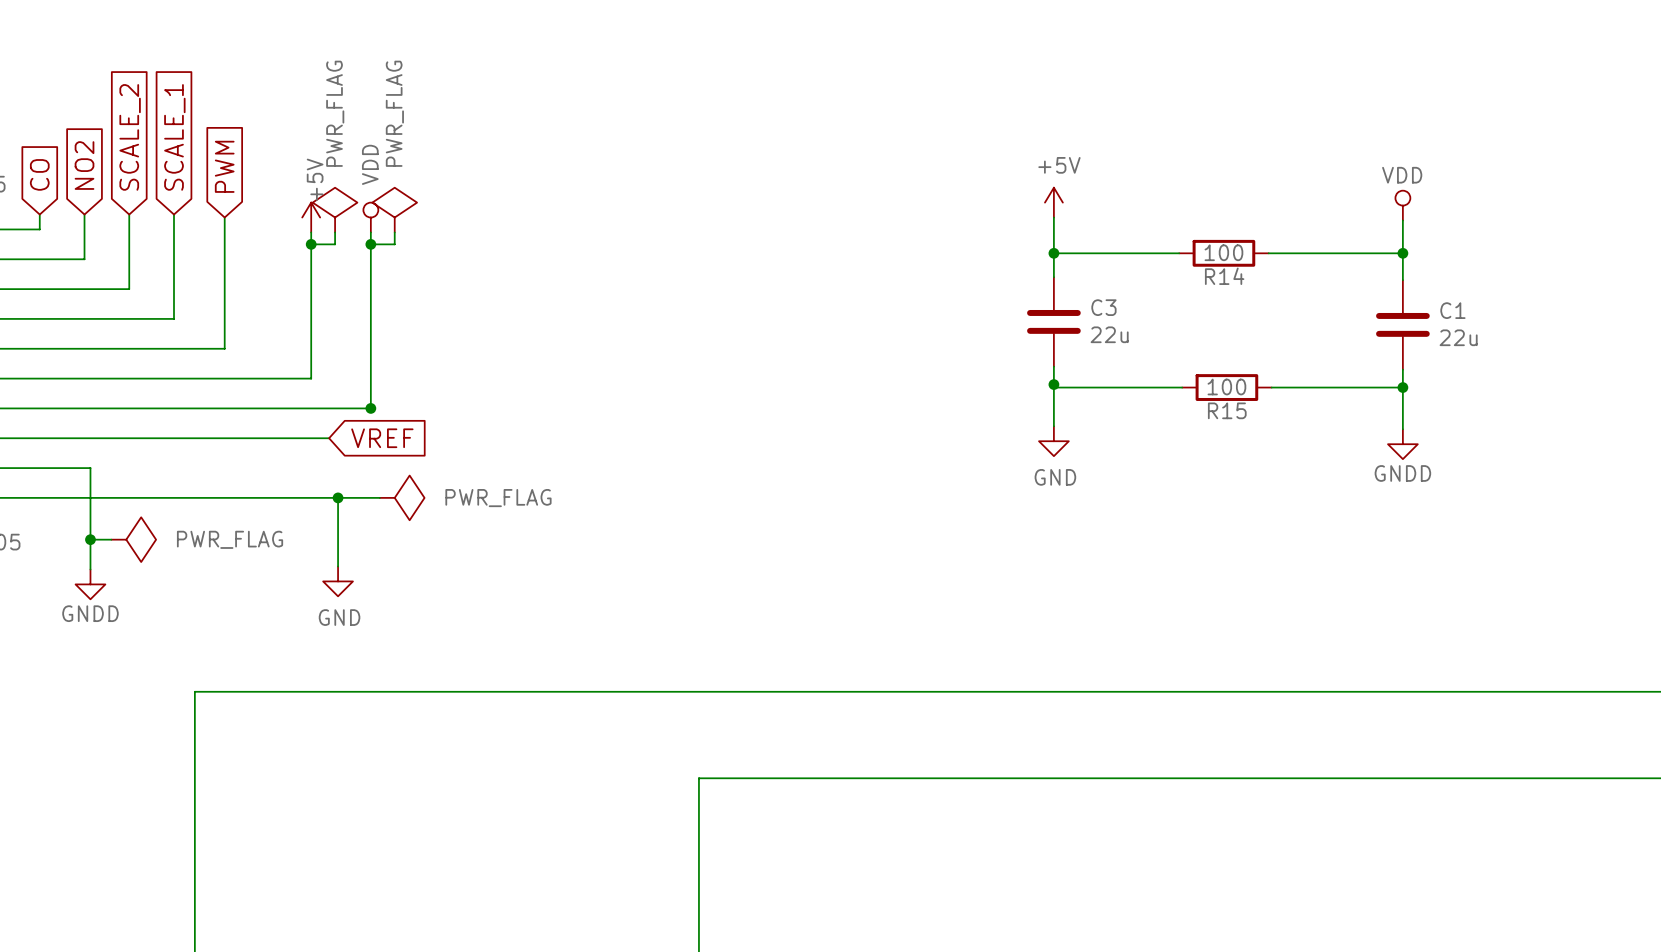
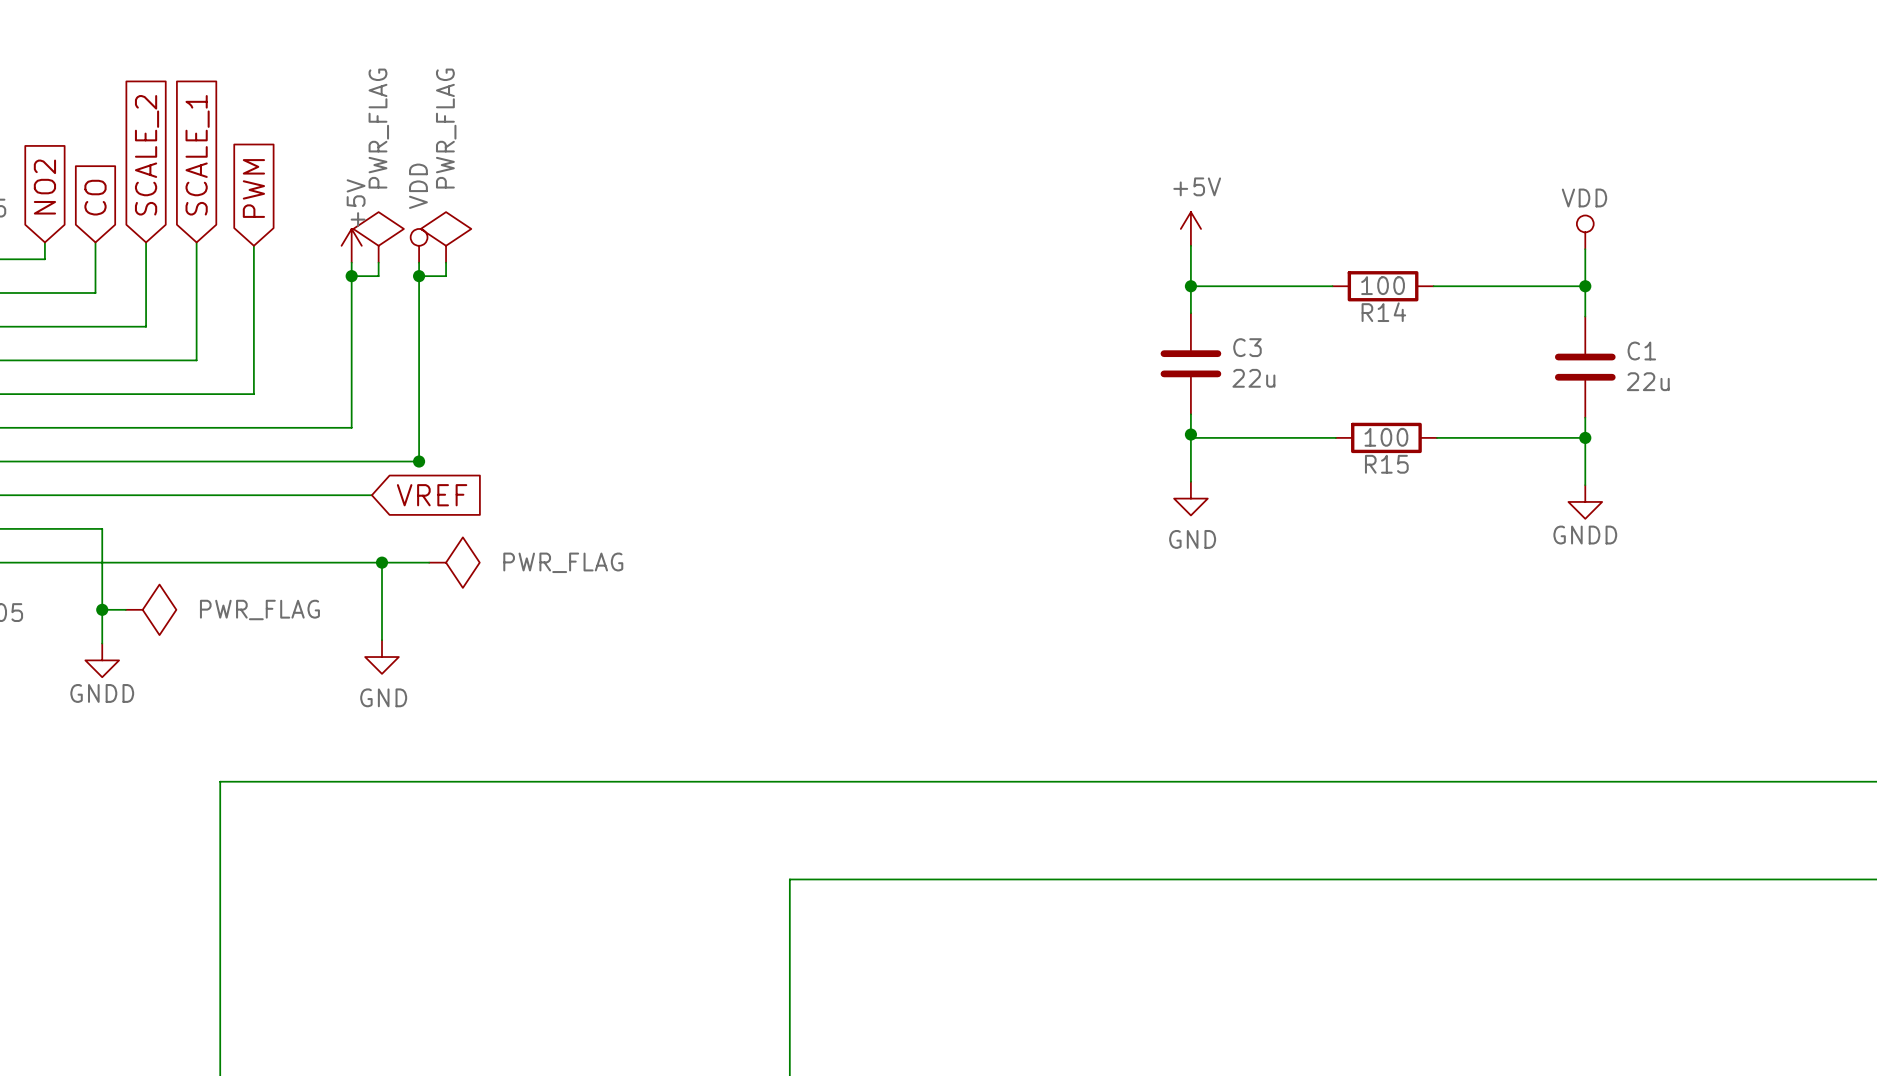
global label: NO2 (84, 165) -> CO (95, 197)
global label: CO (39, 174) -> NO2 (44, 187)

